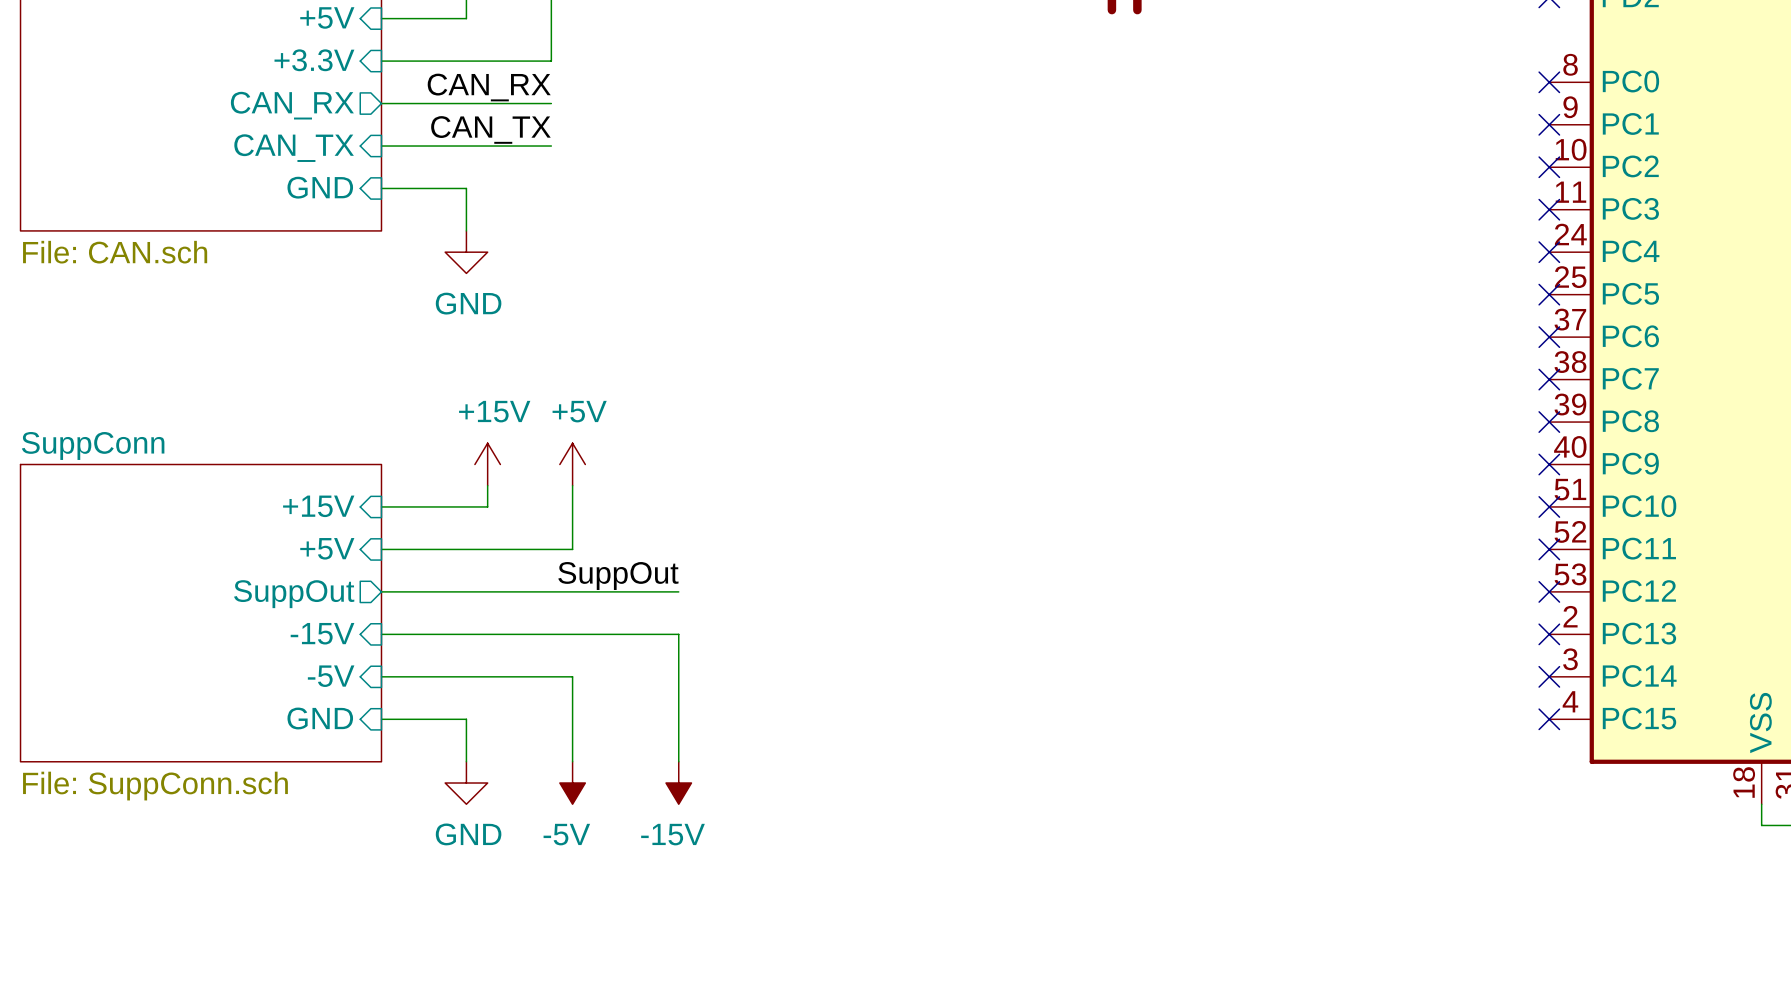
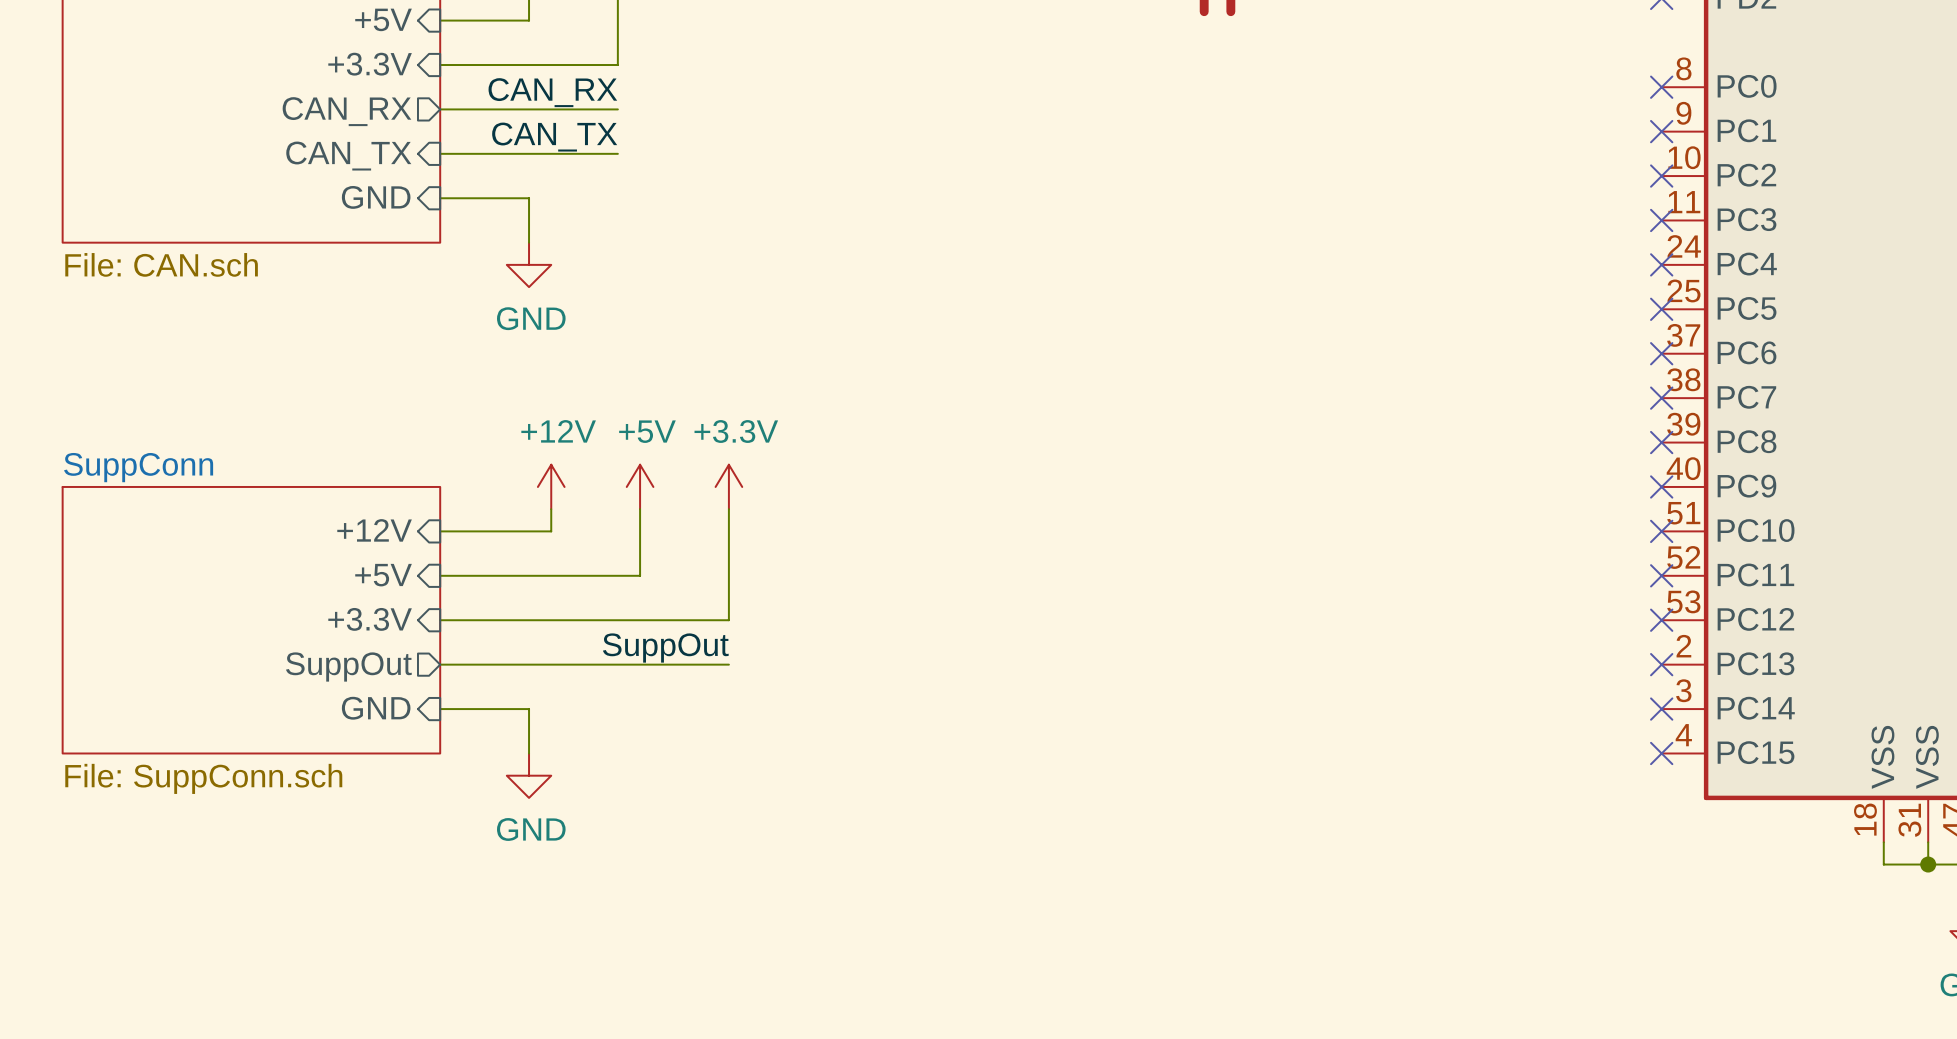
power symbol: +15V (487, 464) -> +12V (551, 486)
power symbol: none -> +3.3V (728, 486)
sheet pin: +15V (318, 506) -> +12V (374, 530)
label position: SuppOut (618, 576) -> SuppOut (665, 648)
sheet SuppConn: none -> File: SuppConn.sch (251, 620)
wire: (657, 591) (678, 591) -> (728, 620) (728, 509)
sheet pin shape: output (294, 594) -> input (370, 619)
sheet pin: SuppOut (294, 594) -> +3.3V (370, 619)
sheet SuppConn: File: SuppConn.sch (201, 613) -> none
sheet pin shape: input (322, 633) -> output (348, 667)
sheet pin: -15V (322, 633) -> SuppOut (348, 667)
wire: (657, 634) (678, 634) (678, 761) -> none
sheet pin: -5V (331, 676) -> GND (376, 708)
wire: (466, 676) (572, 676) (572, 761) -> (529, 709) (529, 753)
sheet pin: GND (320, 718) -> none
wire: (381, 719) (466, 719) (466, 761) -> none
power symbol position: GND (466, 783) -> GND (529, 775)
power symbol: -5V (572, 783) -> none
power symbol: -15V (678, 783) -> none

